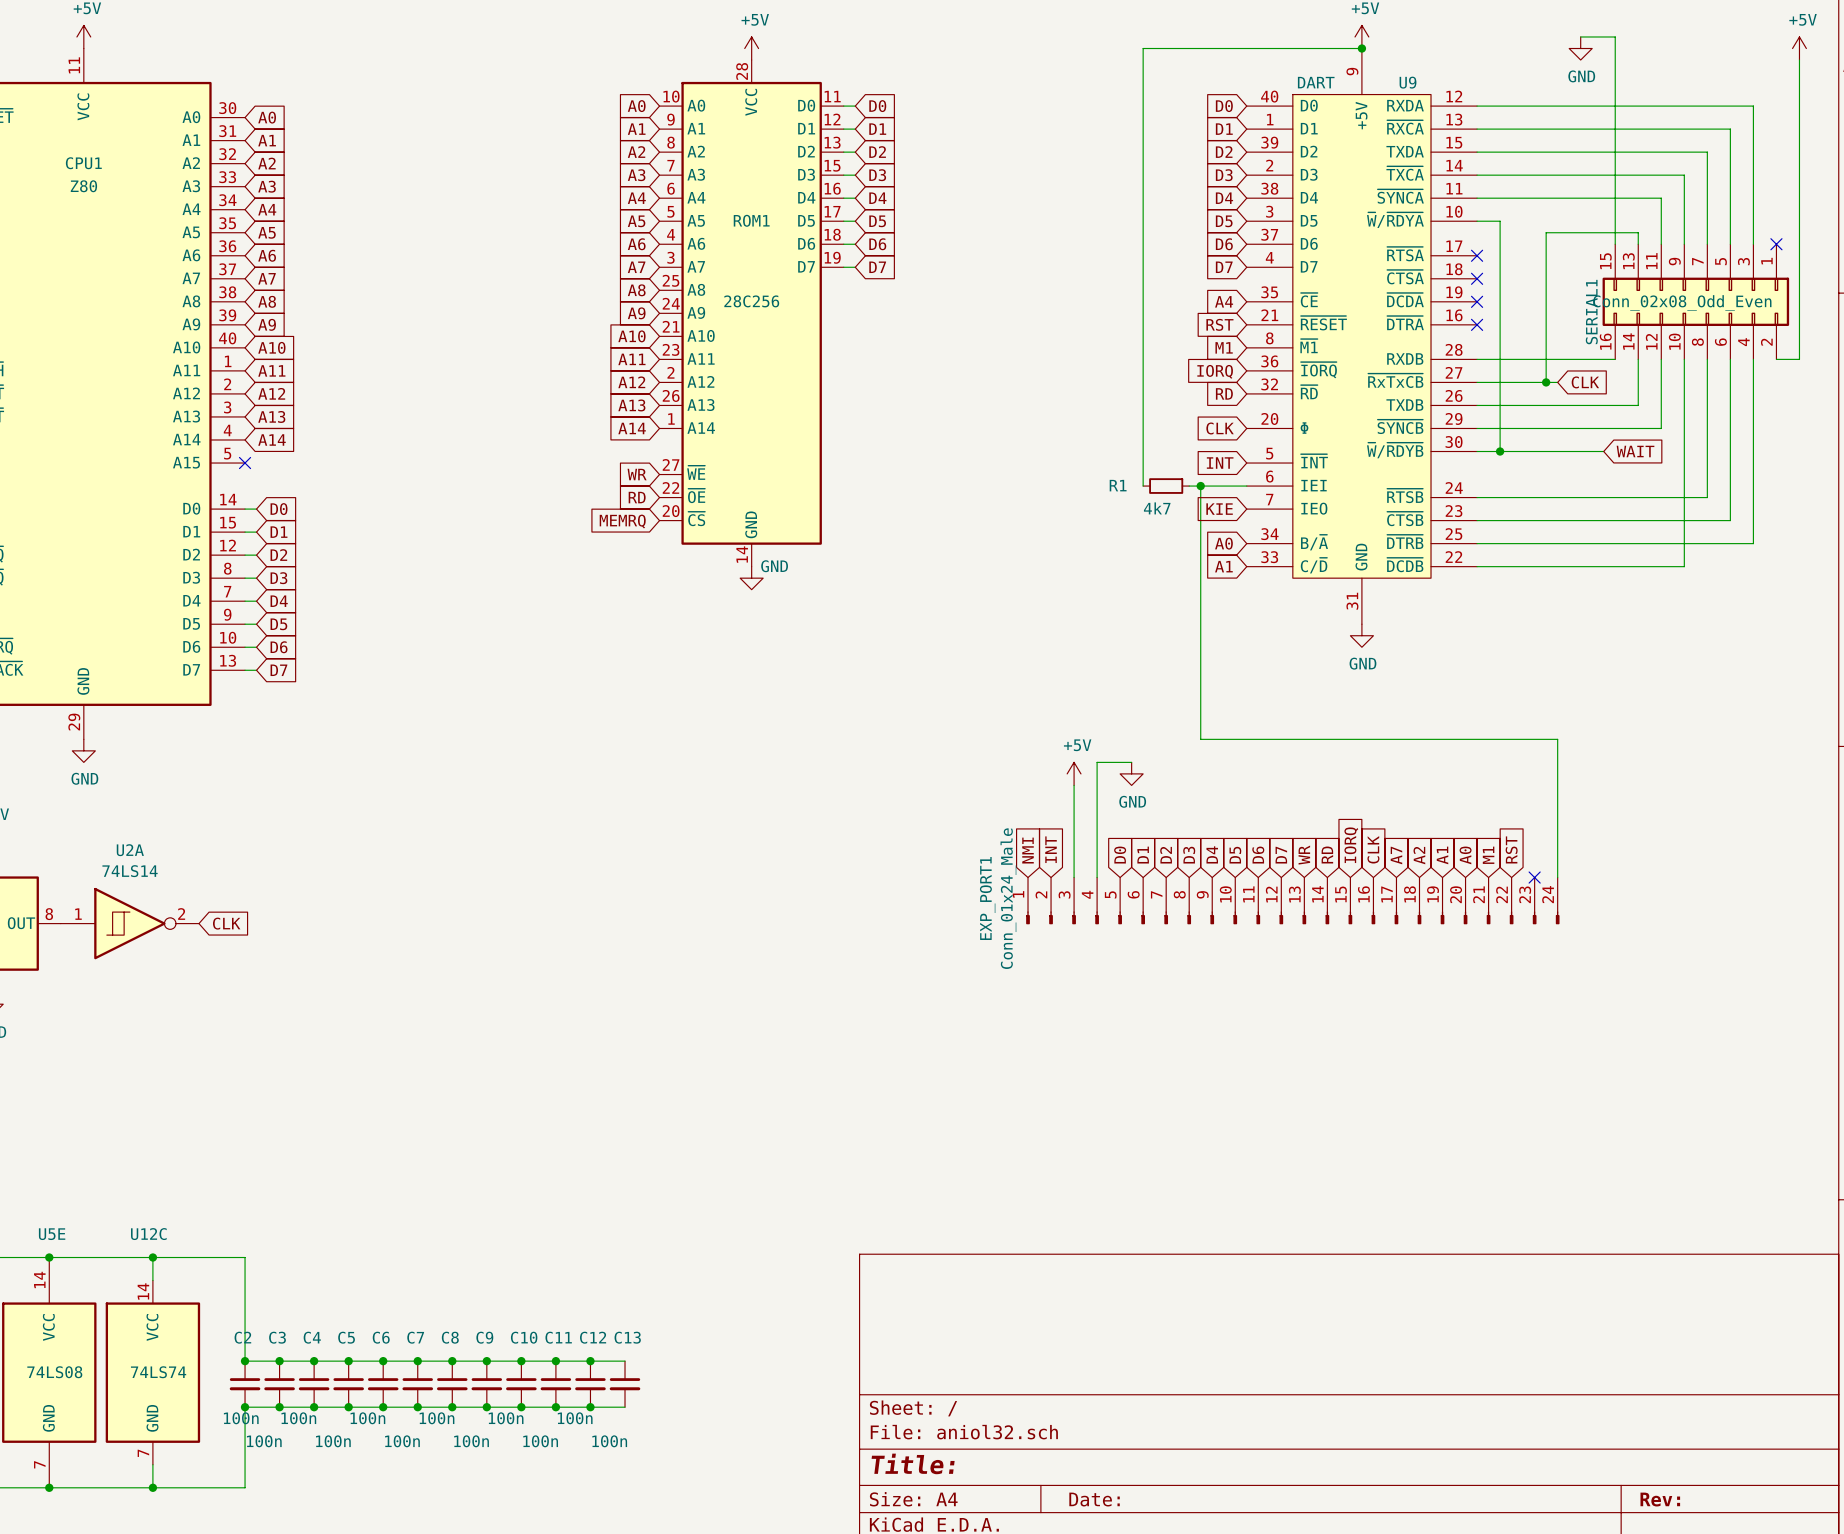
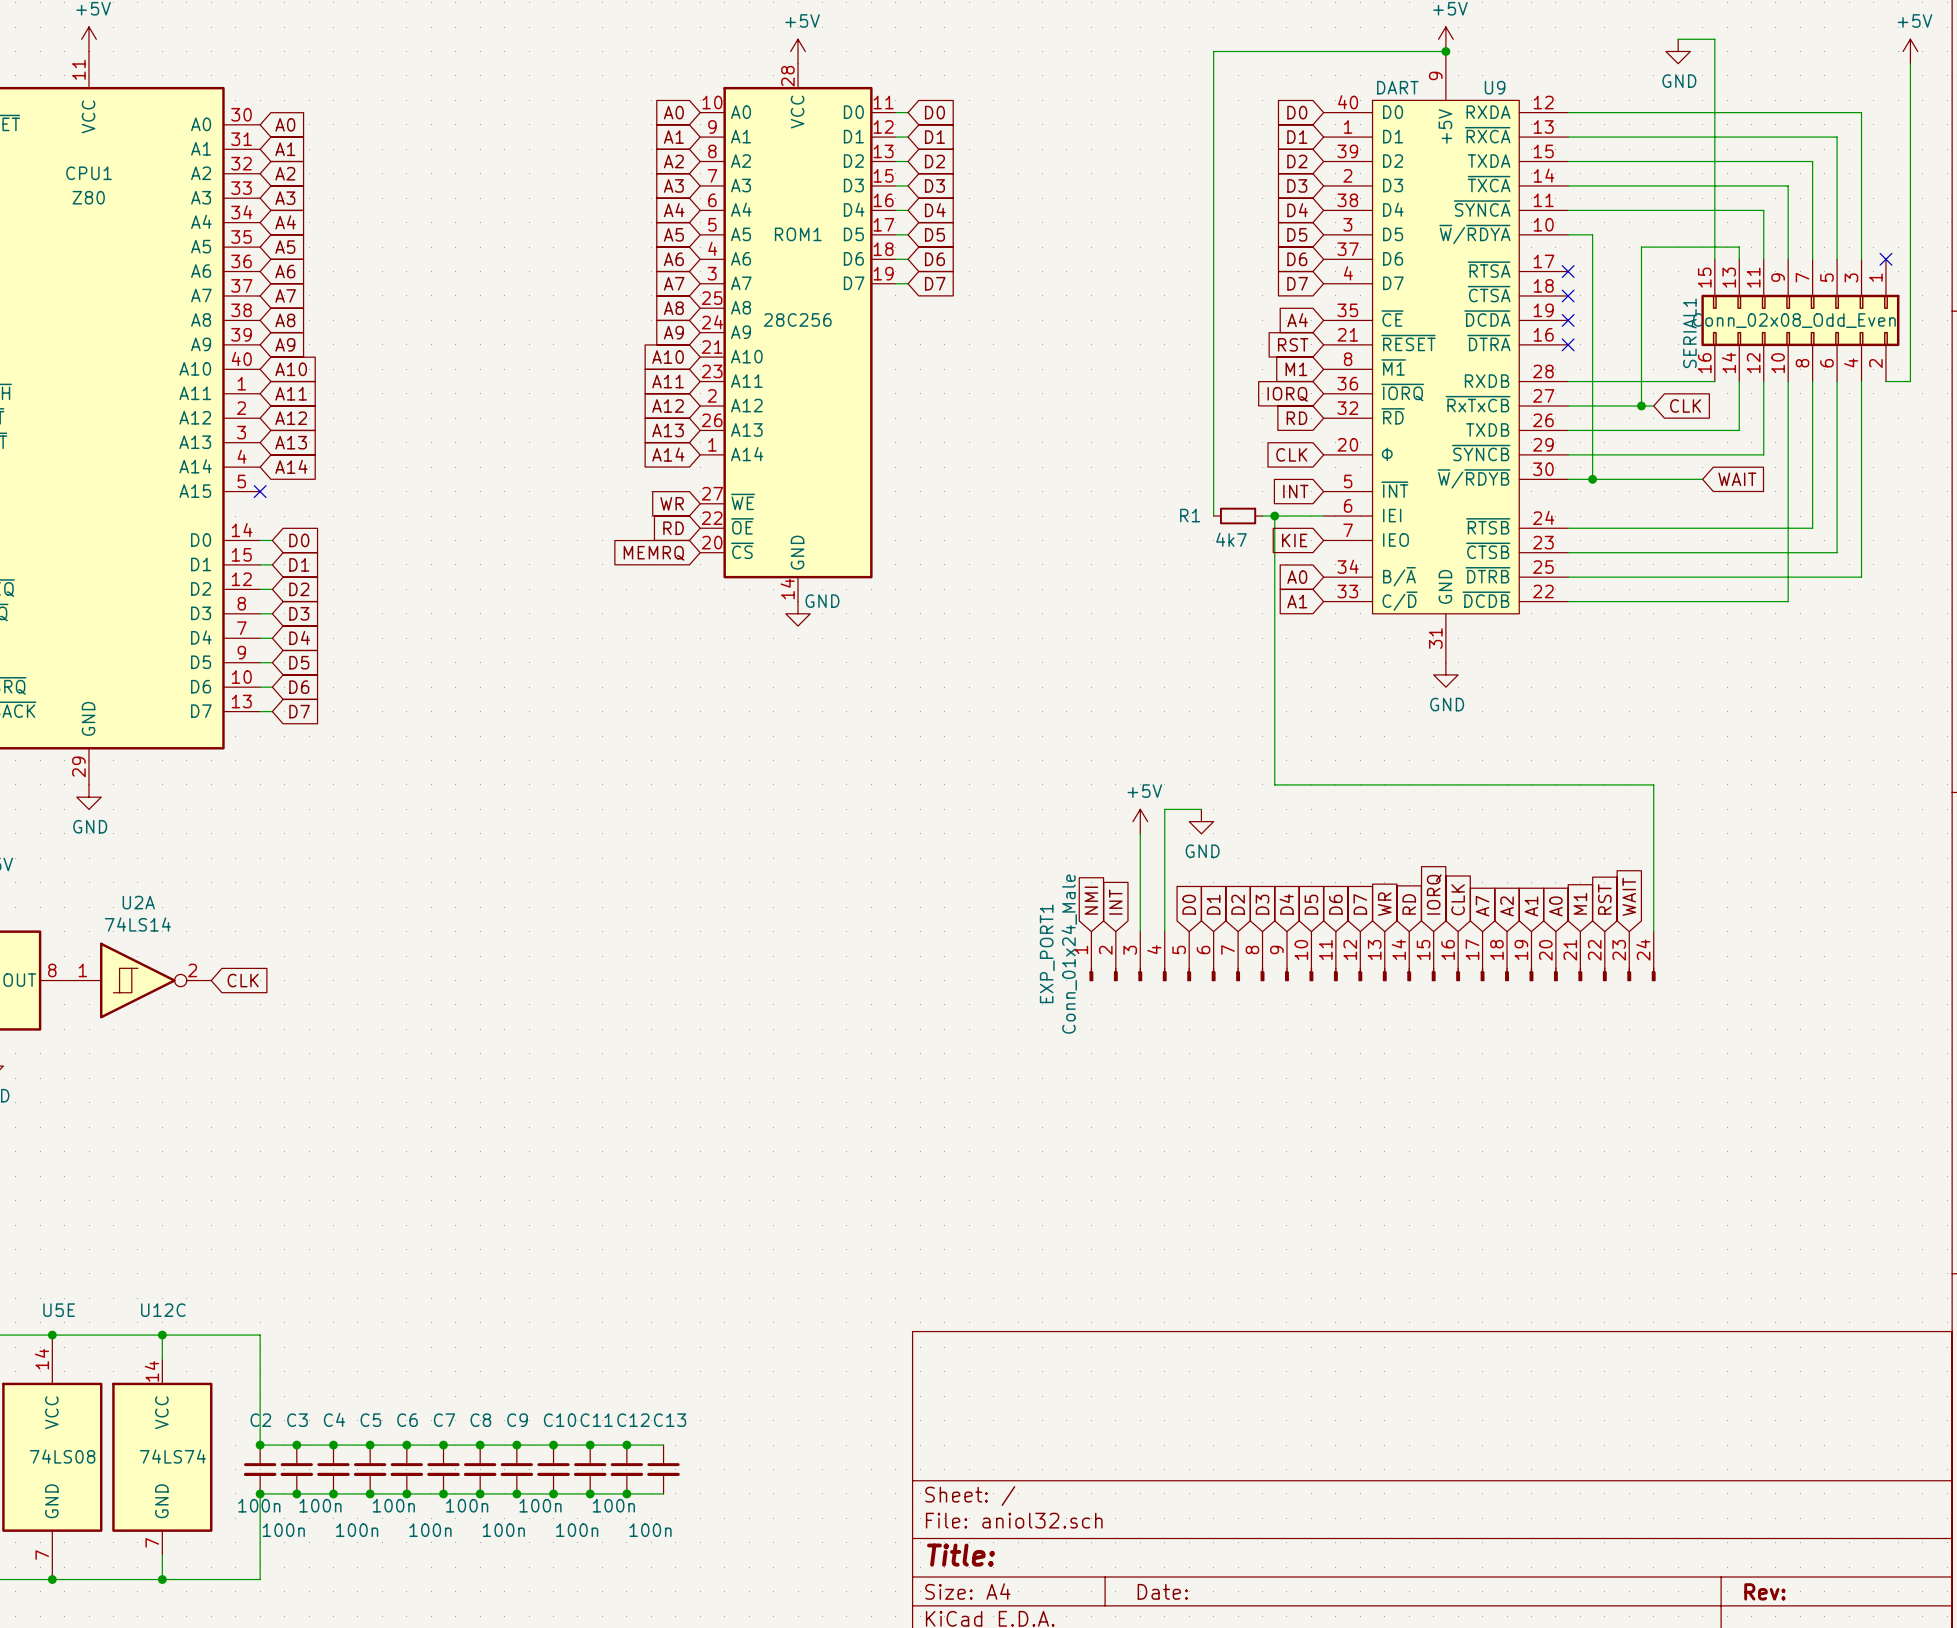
global label: none -> WAIT (1629, 896)
no-connect mark: (1534, 877) -> none

